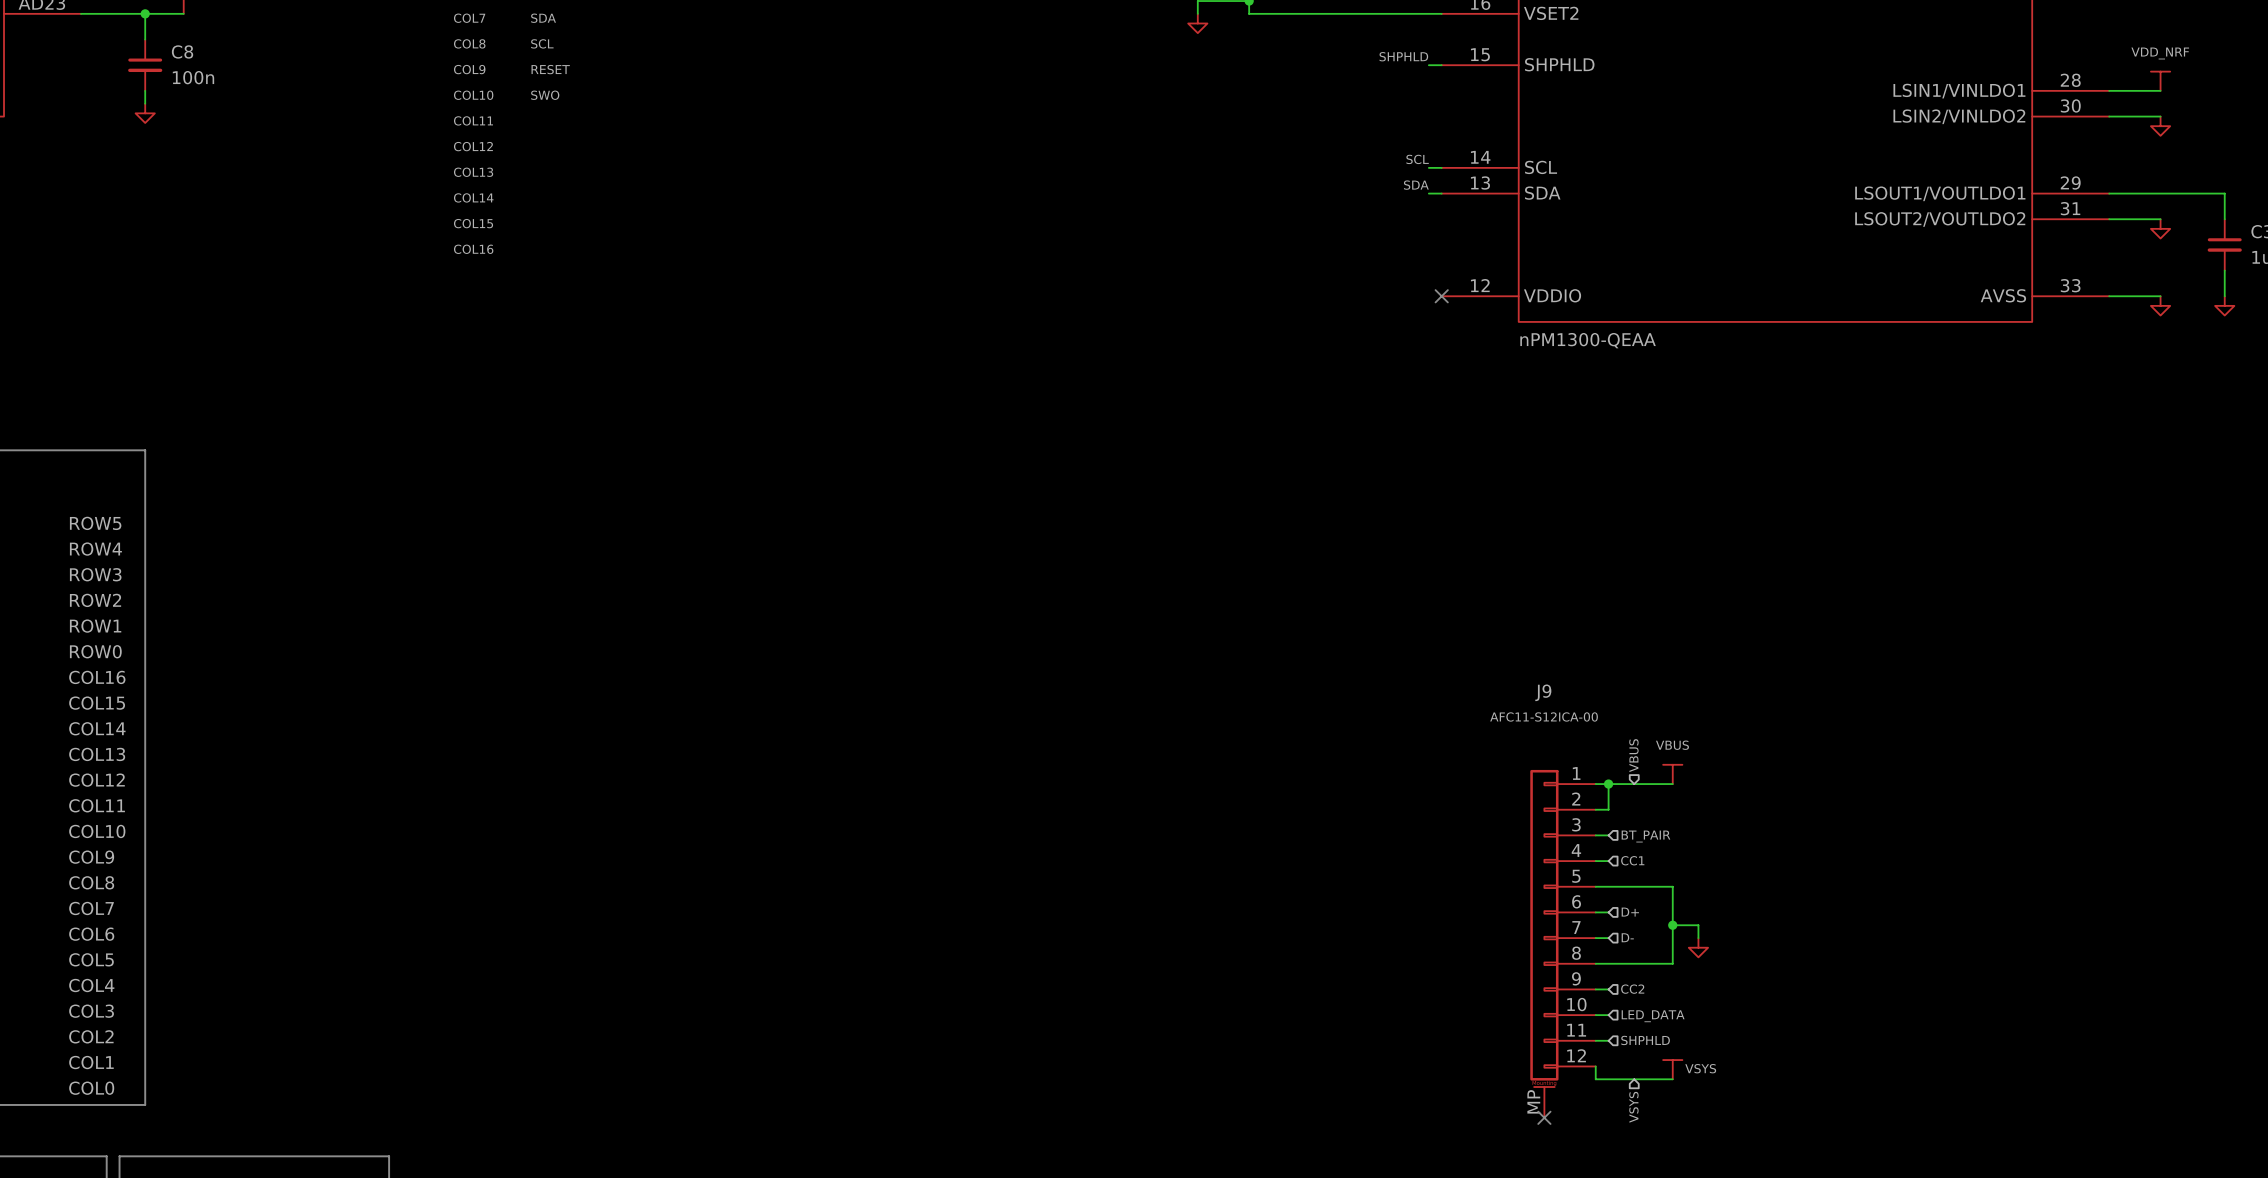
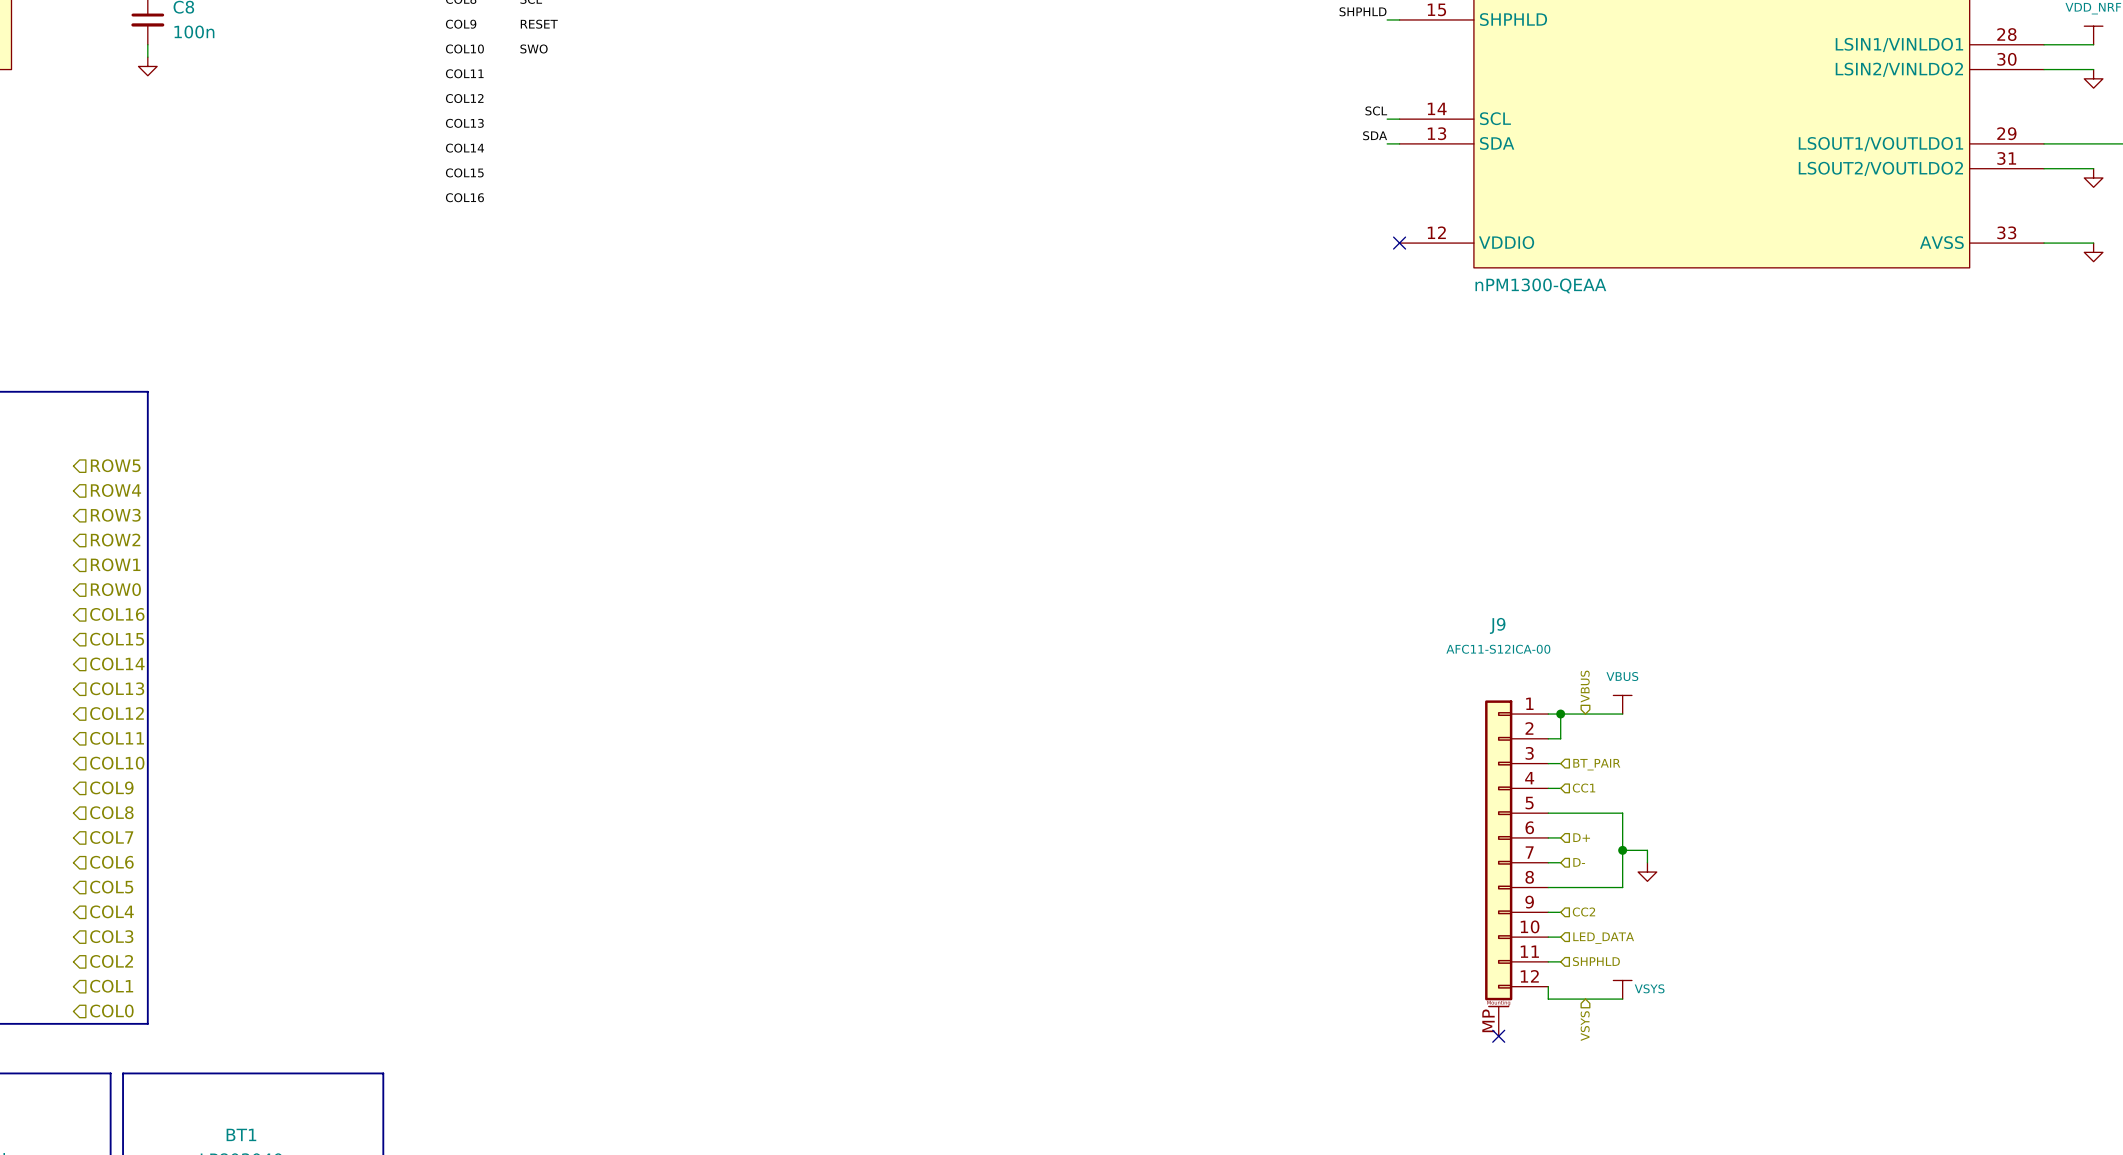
label: ROW5 (95, 523) -> none
hierarchical label: none -> ROW5 (115, 465)
label: ROW4 (95, 549) -> none
hierarchical label: none -> ROW4 (115, 490)
label: ROW3 (95, 574) -> none
hierarchical label: none -> ROW3 (115, 515)
label: ROW2 (95, 600) -> none
hierarchical label: none -> ROW2 (115, 540)
label: ROW1 (95, 626) -> none
hierarchical label: none -> ROW1 (115, 564)
label: ROW0 (95, 651) -> none
hierarchical label: none -> ROW0 (115, 589)
label: COL16 (97, 677) -> none
hierarchical label: none -> COL16 (117, 614)
label: COL15 (97, 703) -> none
hierarchical label: none -> COL15 (117, 639)
label: COL14 (97, 728) -> none
hierarchical label: none -> COL14 (117, 663)
label: COL13 (97, 754) -> none
hierarchical label: none -> COL13 (117, 688)
label: COL12 (96, 780) -> none
hierarchical label: none -> COL12 (117, 713)
label: COL11 (97, 805) -> none
hierarchical label: none -> COL11 (117, 738)
label: COL10 (97, 831) -> none
hierarchical label: none -> COL10 (117, 763)
label: COL9 (91, 857) -> none
hierarchical label: none -> COL9 (111, 787)
label: COL8 (91, 882) -> none
hierarchical label: none -> COL8 (111, 812)
label: COL7 (91, 908) -> none
hierarchical label: none -> COL7 (111, 837)
label: COL6 (91, 934) -> none
hierarchical label: none -> COL6 (111, 862)
label: COL5 (91, 959) -> none
hierarchical label: none -> COL5 (111, 887)
label: COL4 (91, 985) -> none
hierarchical label: none -> COL4 (111, 911)
label: COL3 (91, 1011) -> none
hierarchical label: none -> COL3 (111, 936)
label: COL2 (91, 1036) -> none
hierarchical label: none -> COL2 (111, 961)
label: COL1 (91, 1062) -> none
hierarchical label: none -> COL1 (111, 986)
label: COL0 (91, 1088) -> none
hierarchical label: none -> COL0 (111, 1011)

